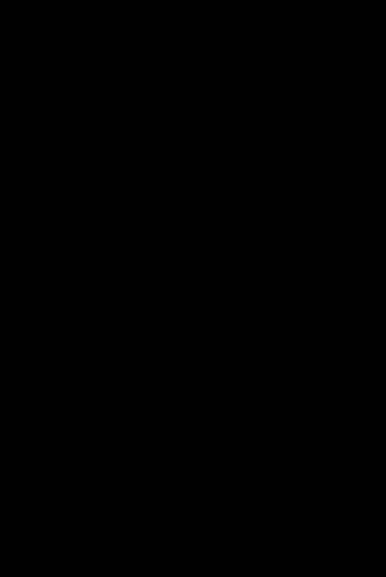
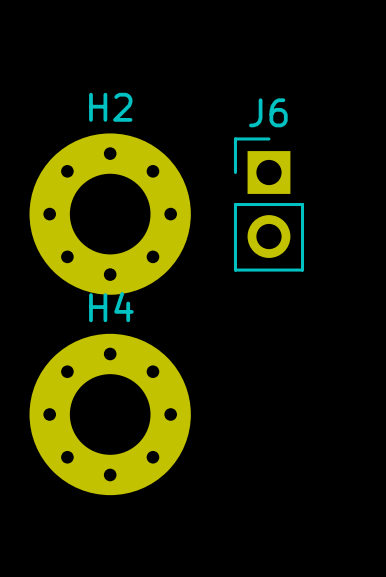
J6: none -> (268, 204)
H2: none -> (110, 214)
H4: none -> (110, 414)

